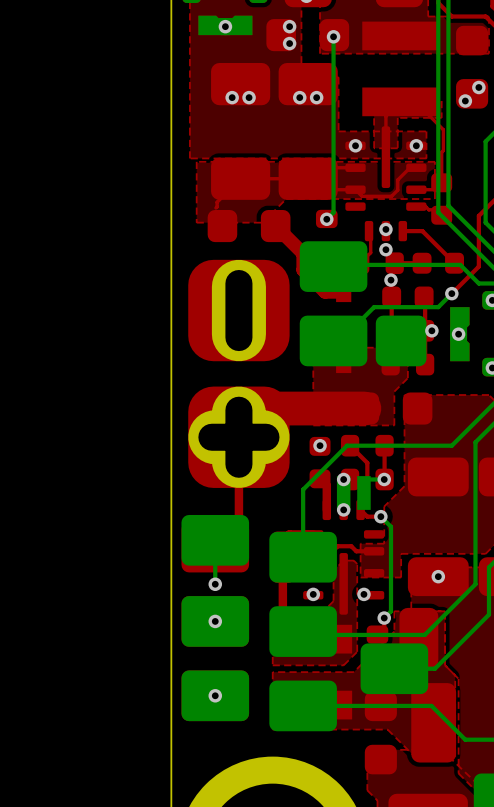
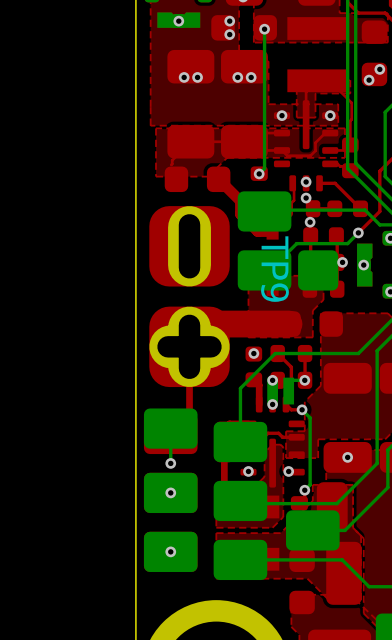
TP9 name: none -> TP9 (274, 269)

